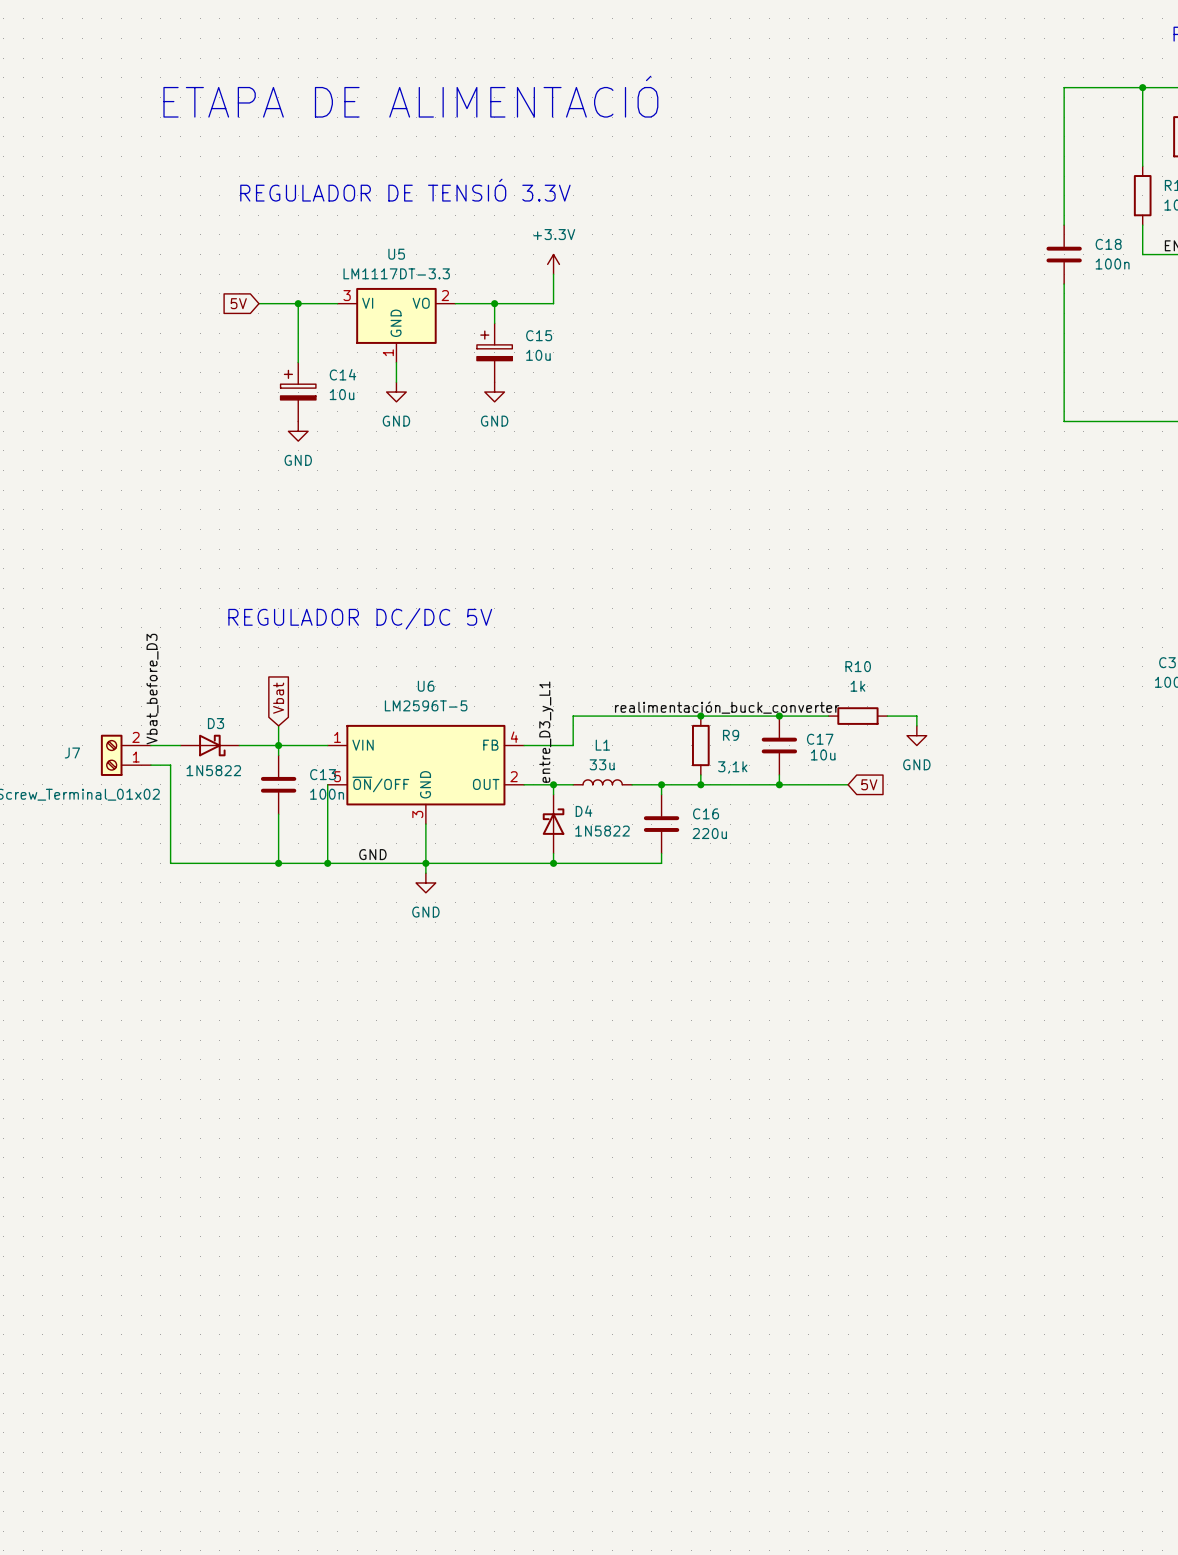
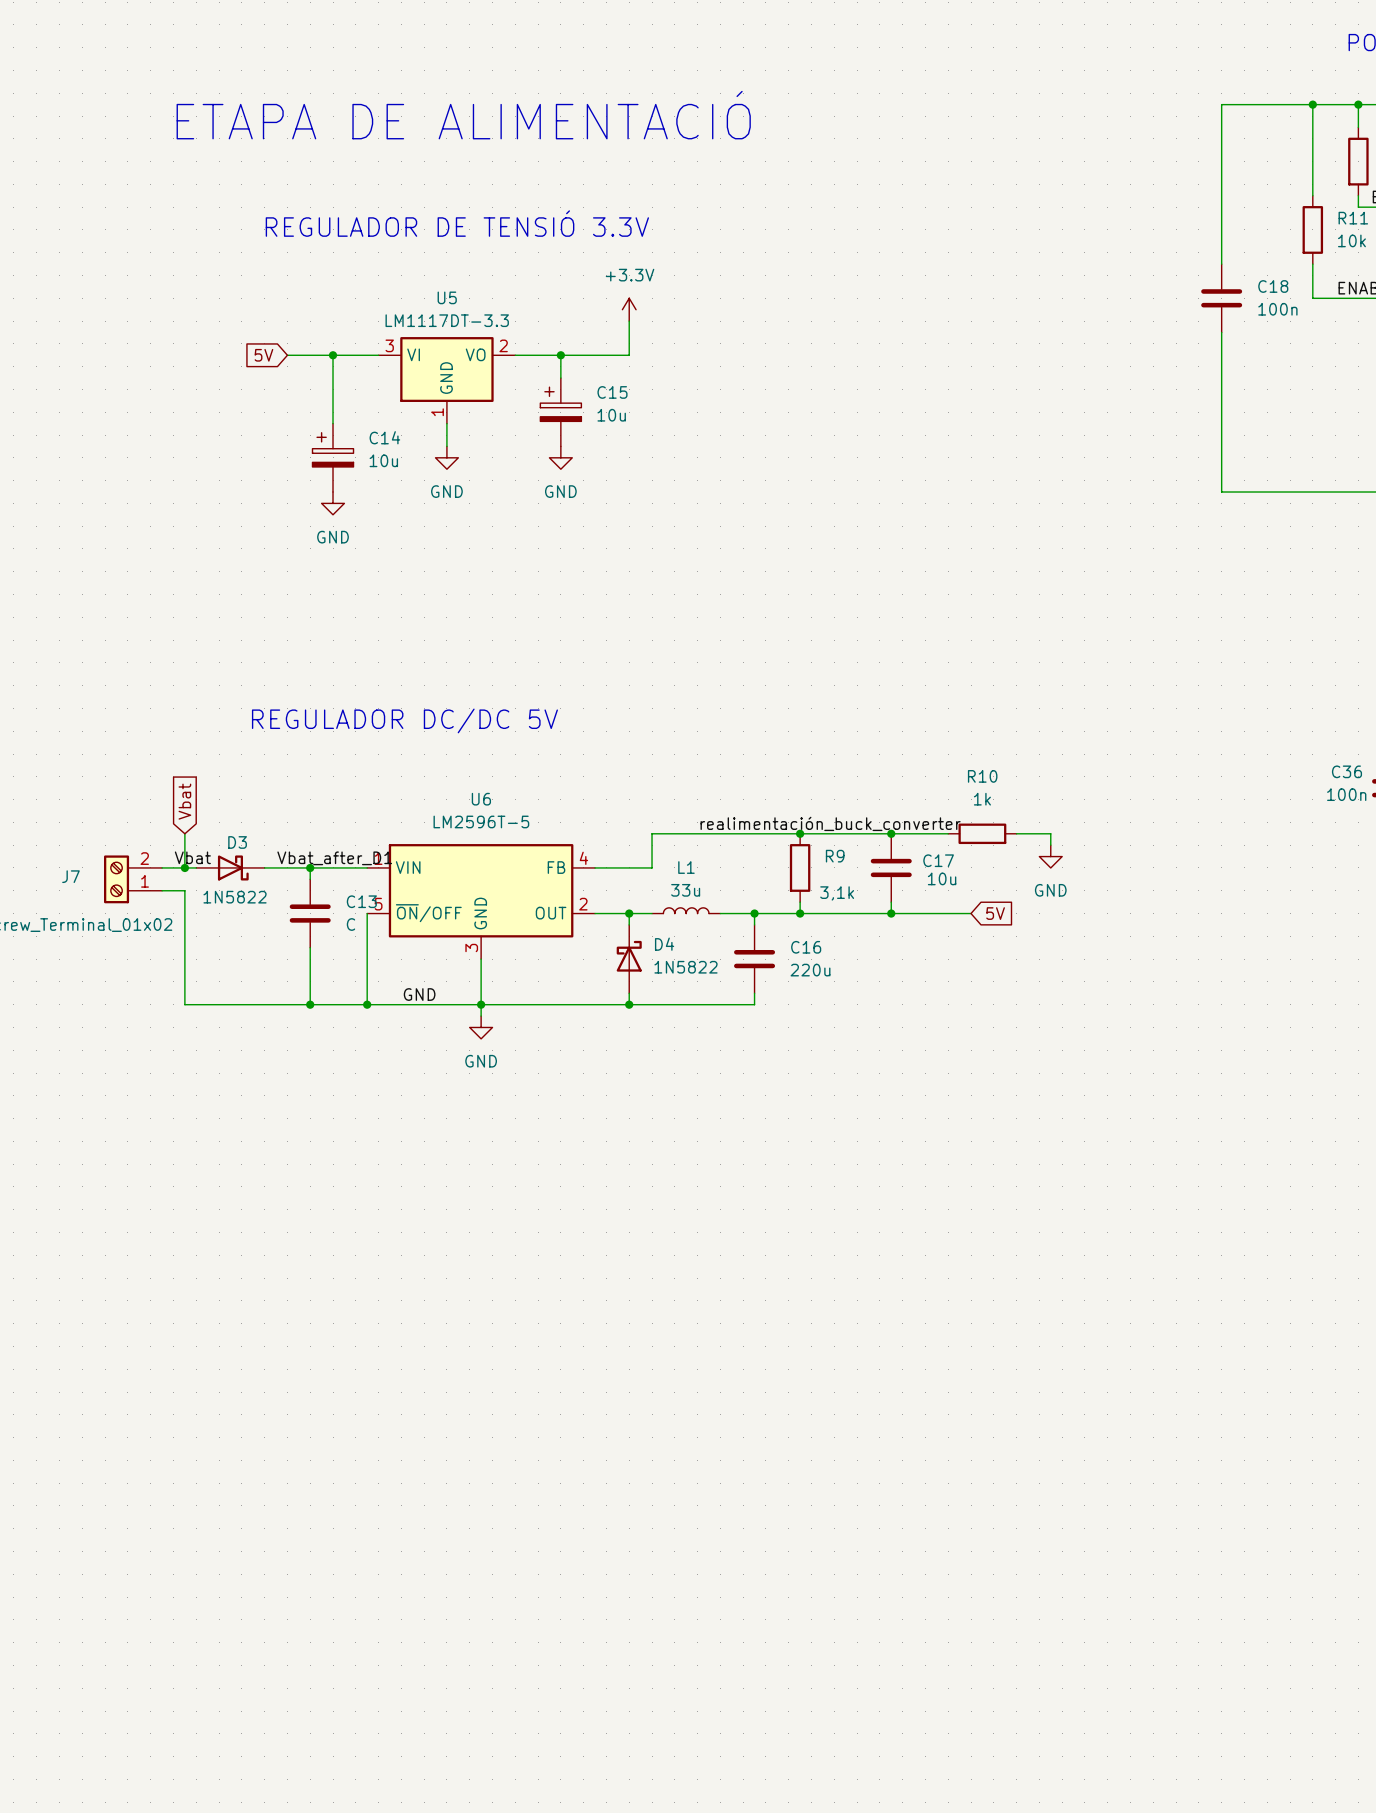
label: Vbat_before_D3 (152, 689) -> Vbat (192, 857)
global label position: Vbat (278, 698) -> Vbat (184, 801)
wire: none -> (184, 833) (184, 867)
label: entre_D3_y_L1 (546, 732) -> none
label: none -> Vbat_after_D1 (334, 858)
junction: none -> (184, 867)
C13 value: 100n (327, 794) -> C (350, 924)

